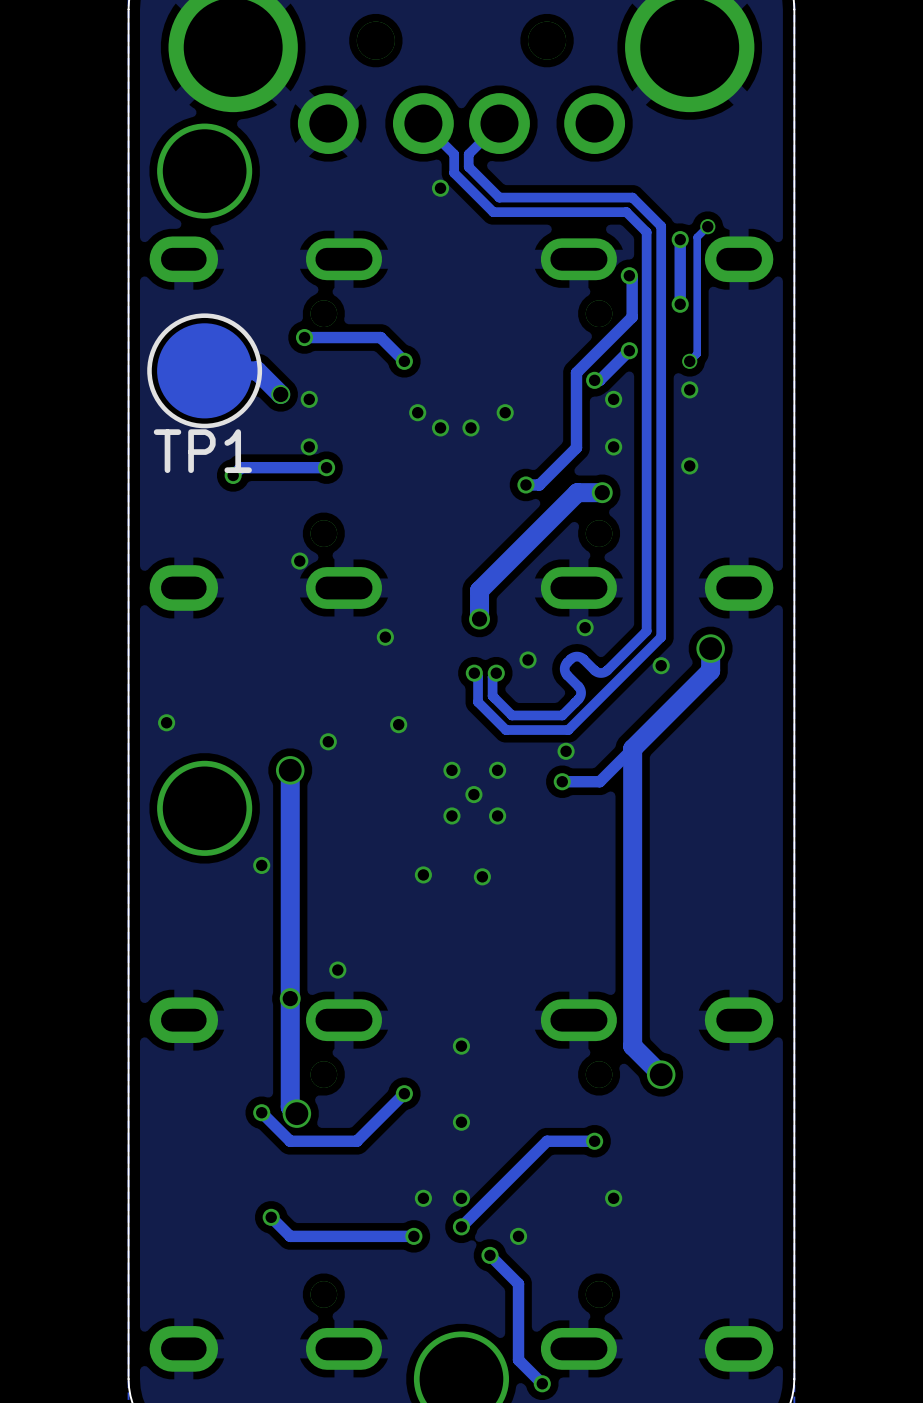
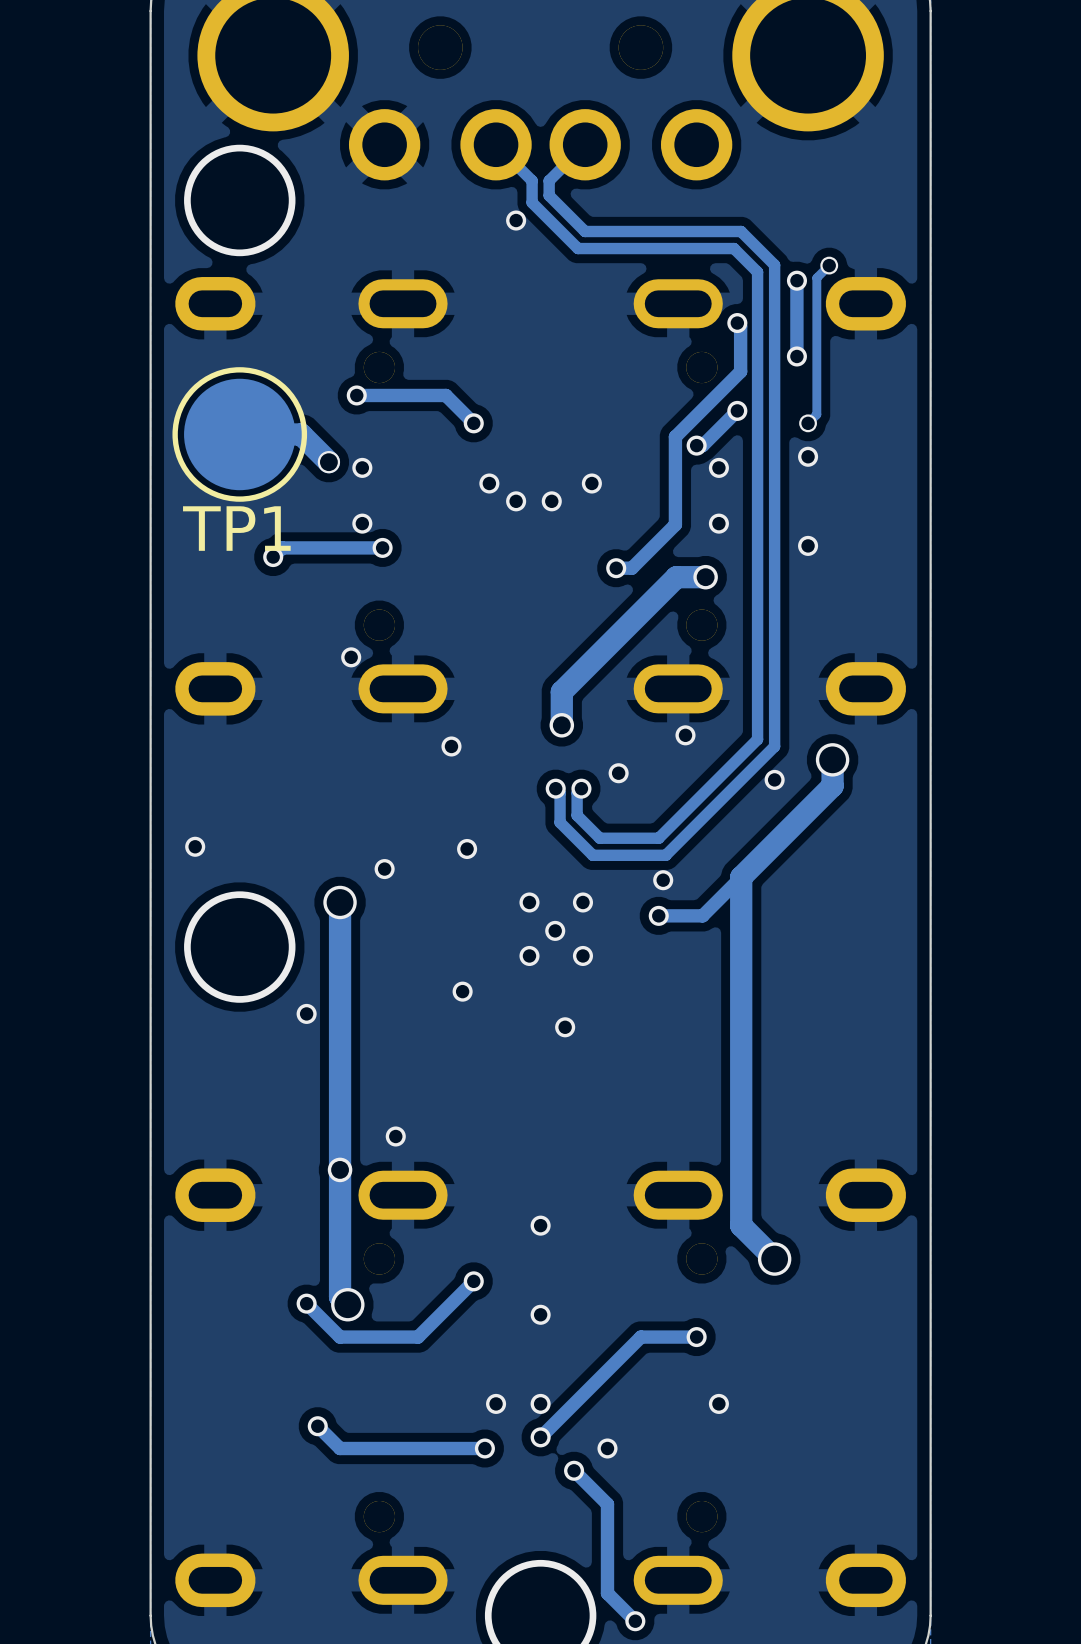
track: (607, 670) (603, 672) (597, 672) (580, 657) (570, 659) (565, 664) (564, 670) (580, 688) (580, 694) (578, 699) -> (711, 785) (677, 819)
via position: (423, 874) -> (462, 991)

